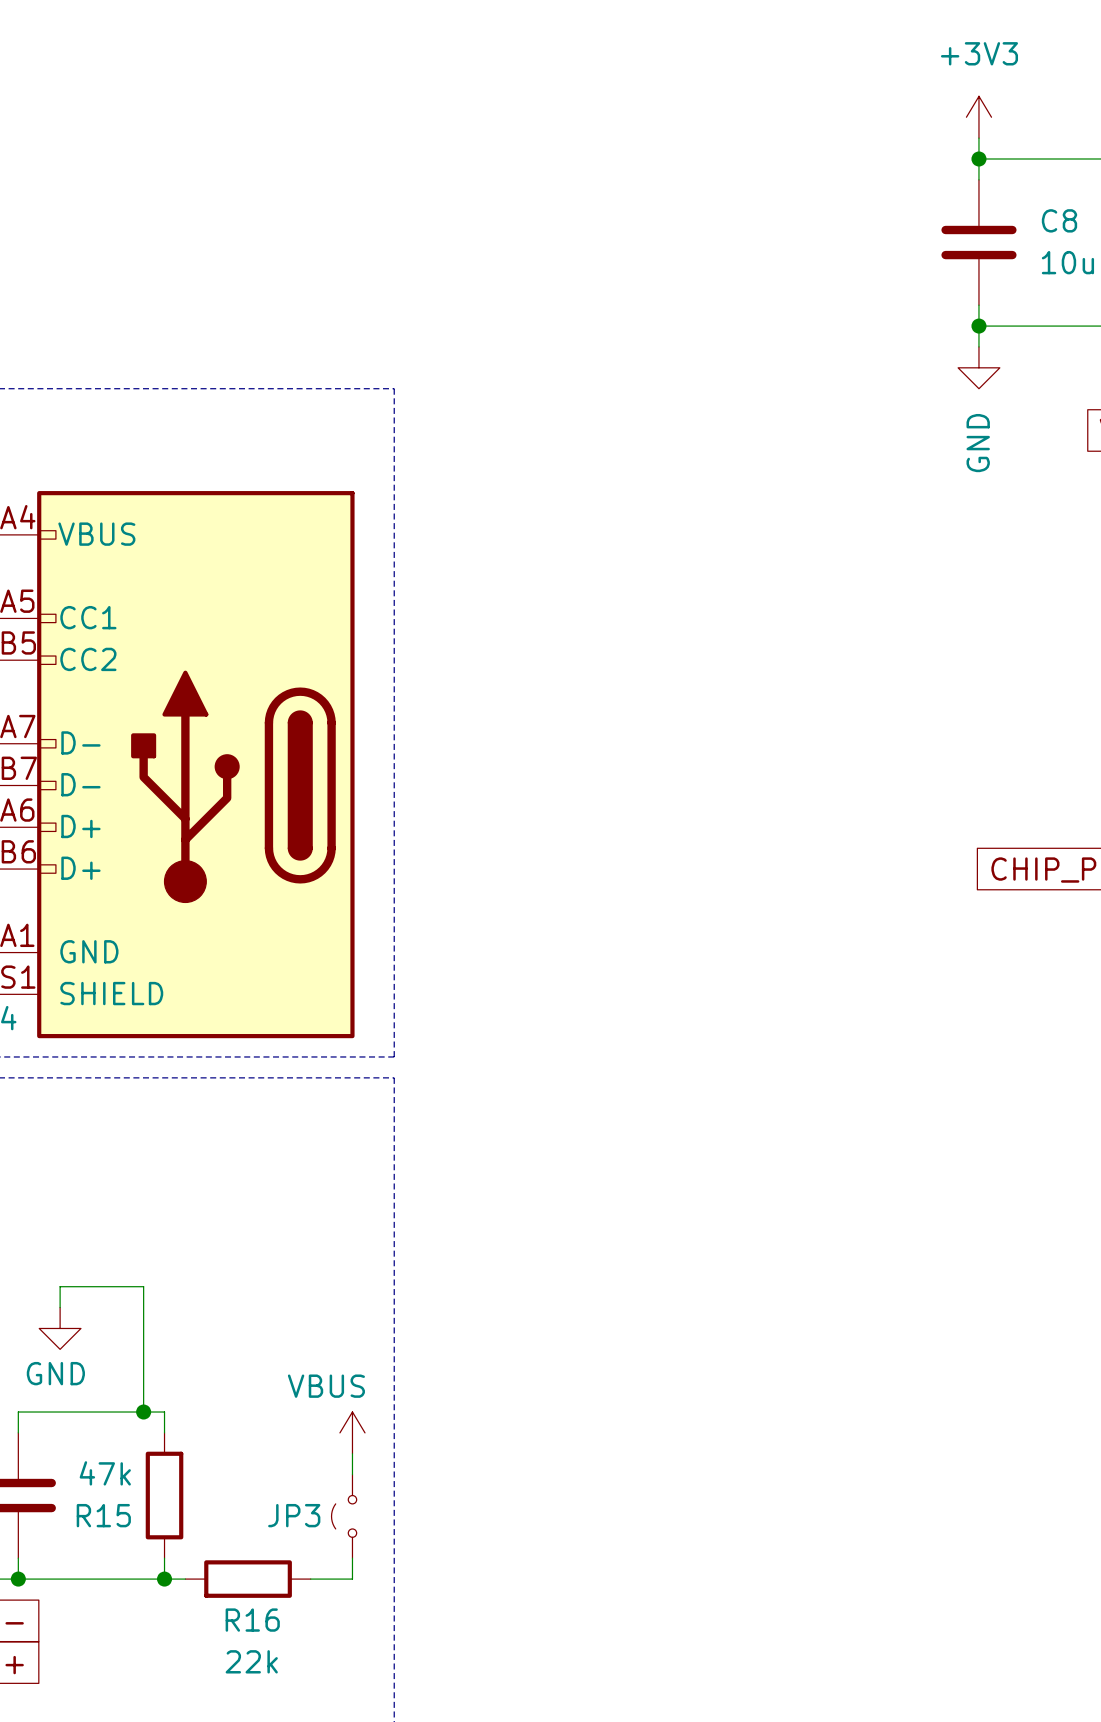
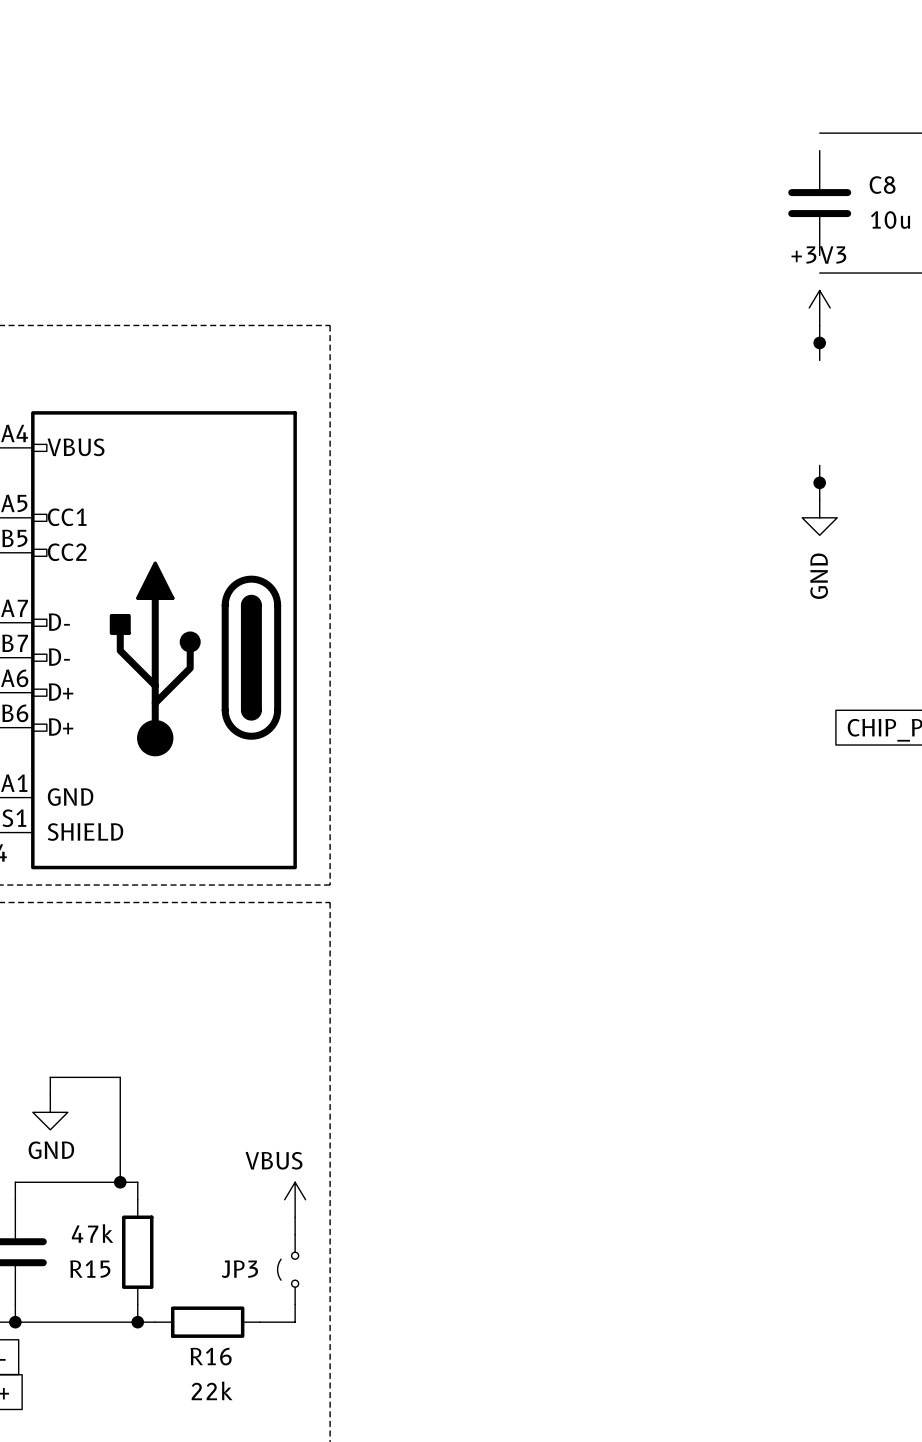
power symbol: +3V3 (978, 117) -> none
wire: (978, 138) (978, 179) -> (819, 325) (819, 360)
junction: (978, 158) -> none
wire: (978, 305) (978, 346) -> (819, 465) (819, 500)
junction position: (978, 326) -> (819, 342)
power symbol: GND (978, 367) -> +3V3 (819, 307)
junction: none -> (819, 482)
power symbol: none -> GND (819, 517)

